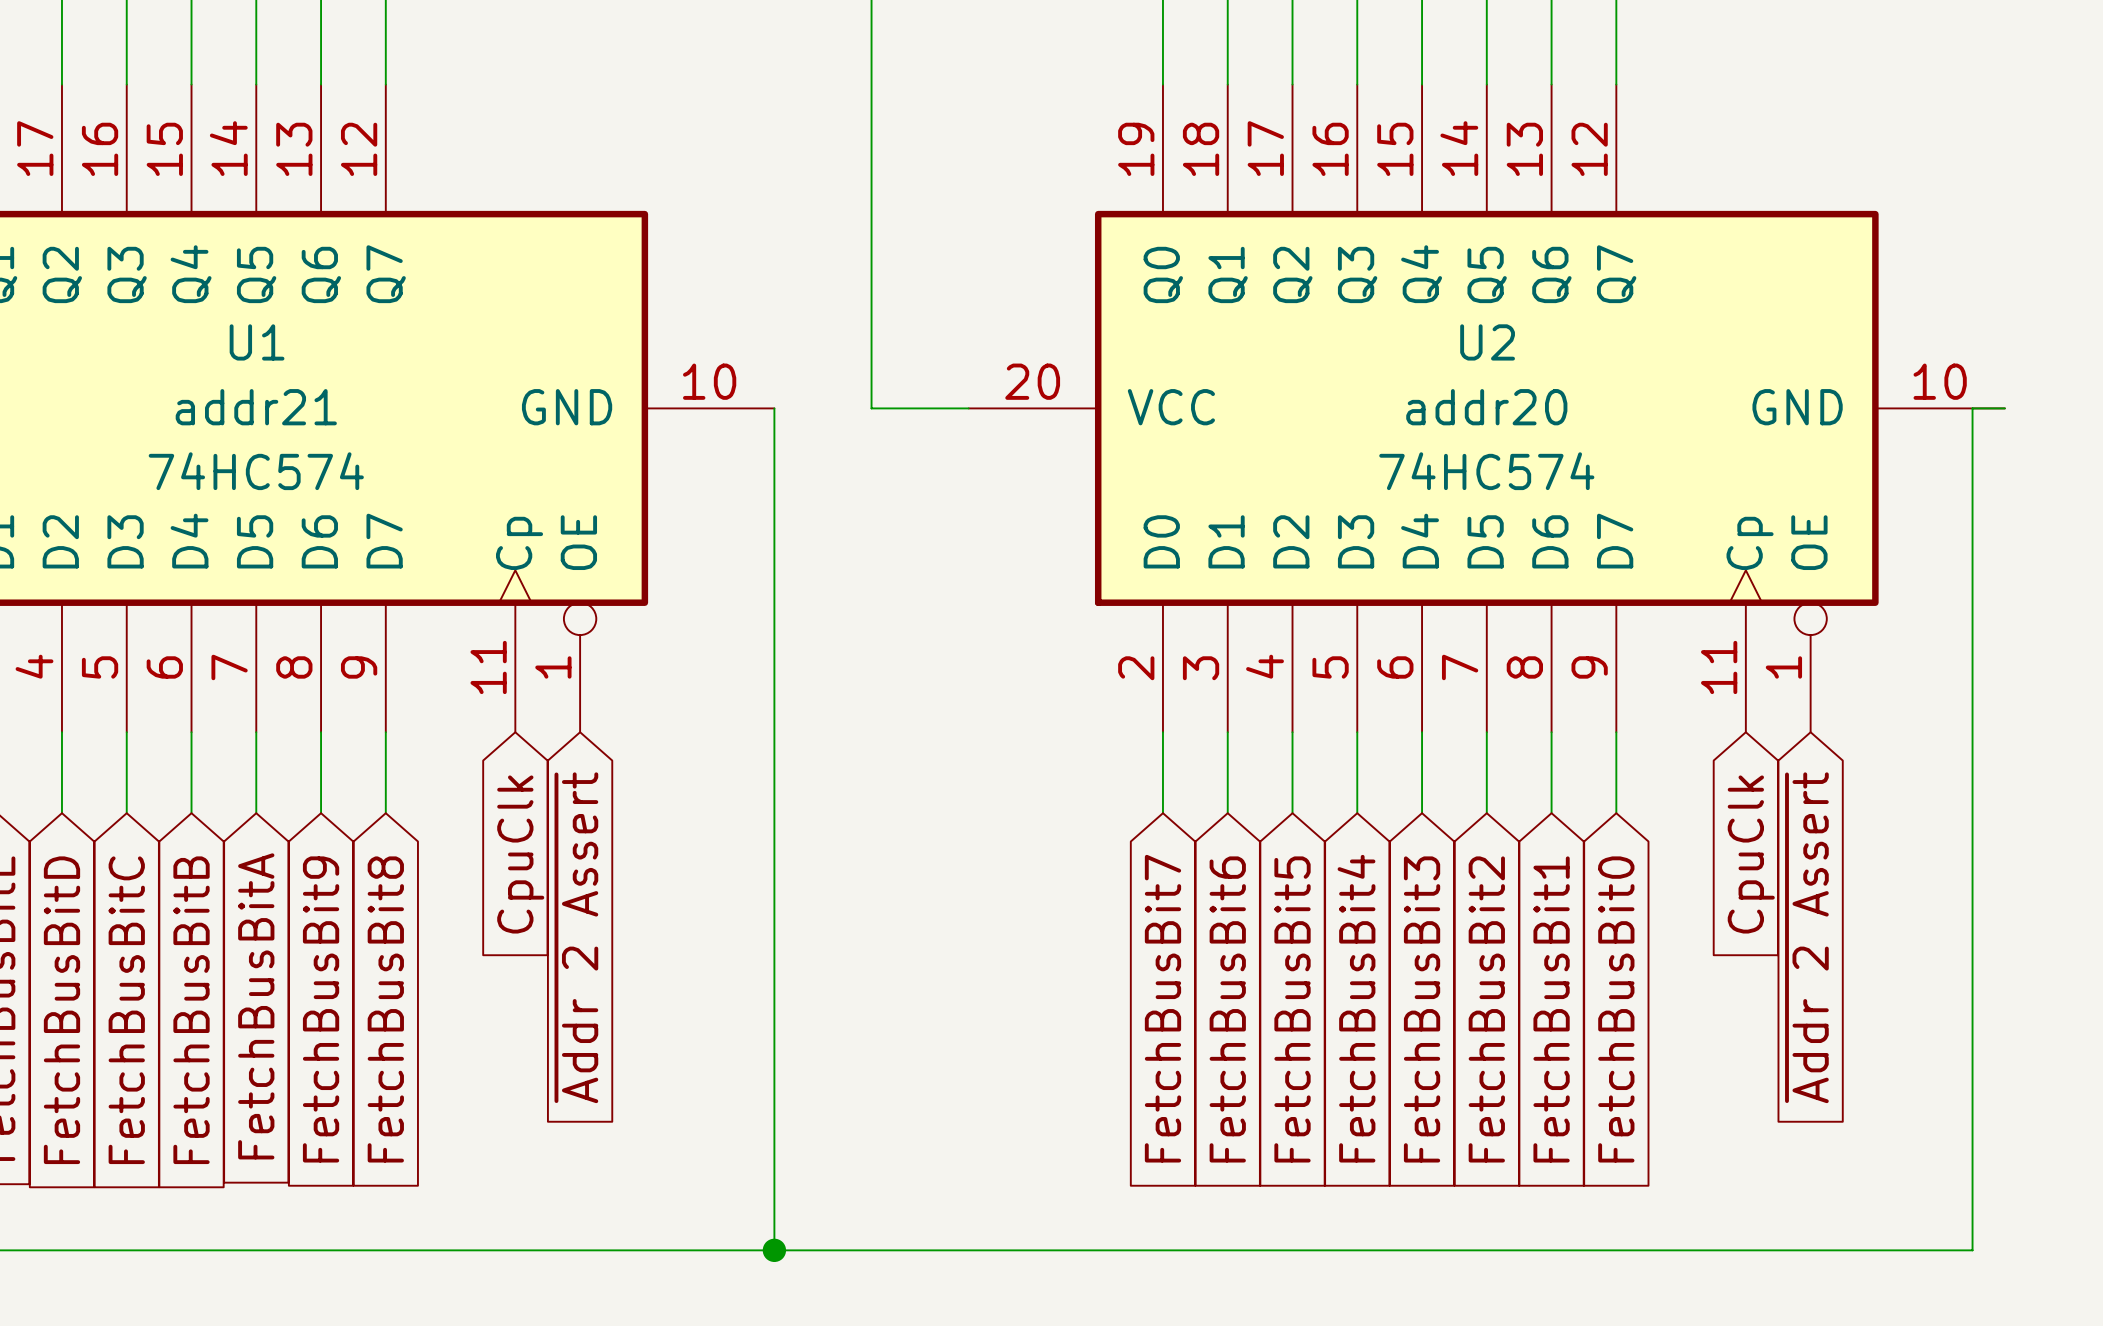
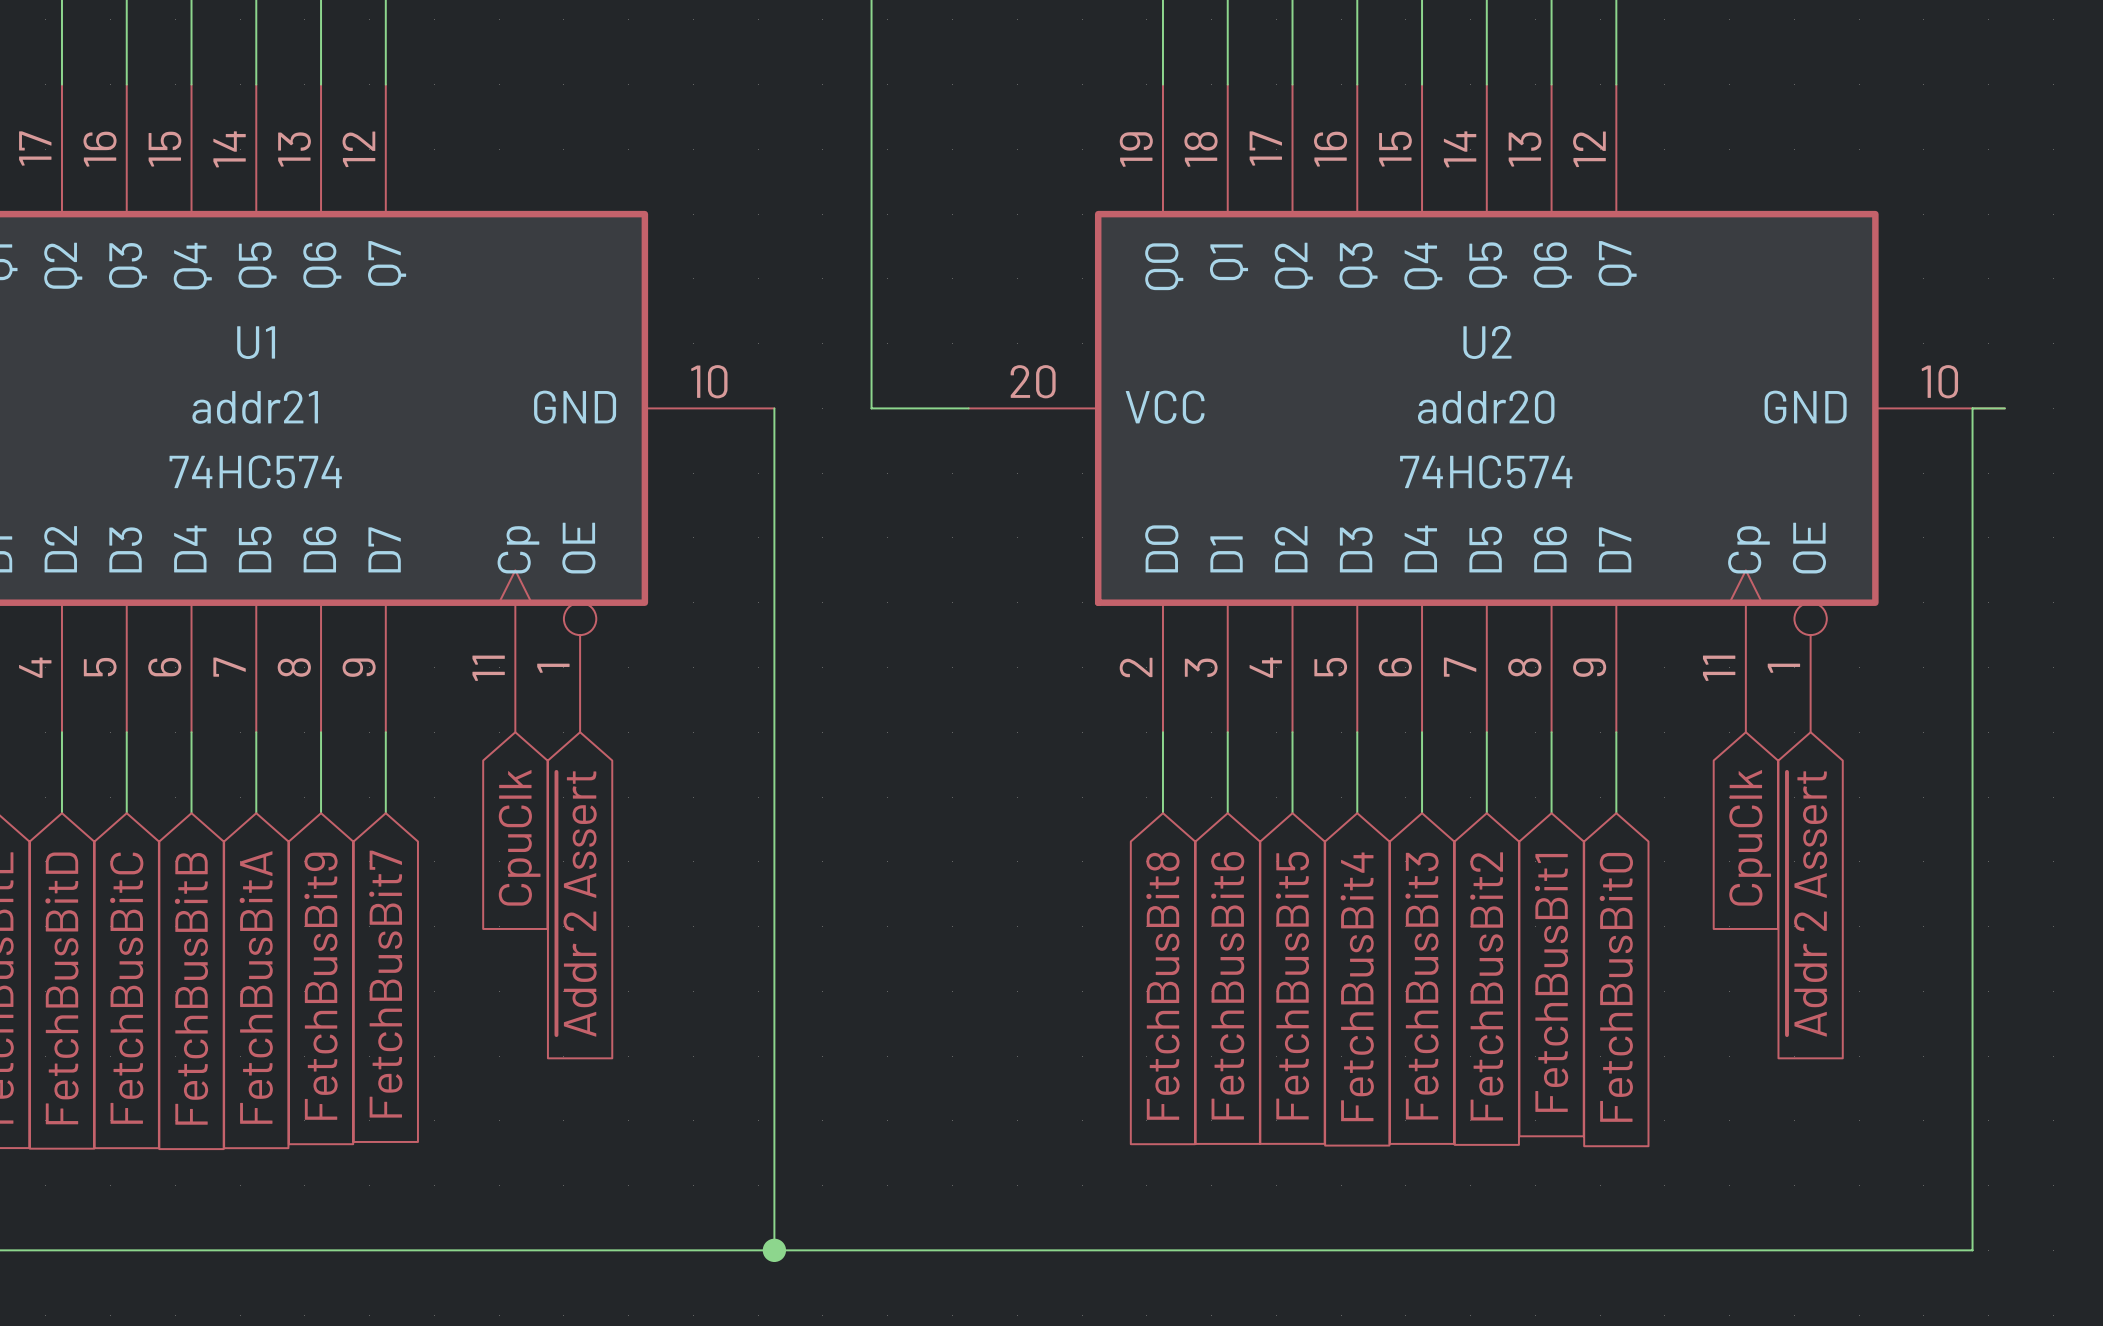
global label: FetchBusBit7 (1162, 1008) -> FetchBusBit8 (1162, 986)
global label: FetchBusBit8 (385, 1009) -> FetchBusBit7 (385, 984)

